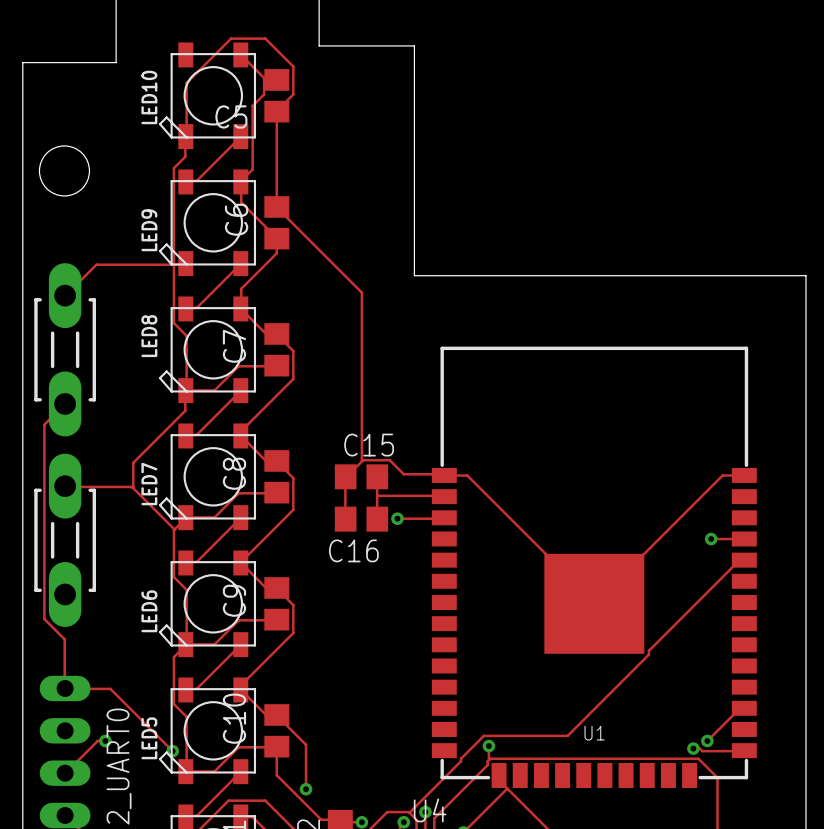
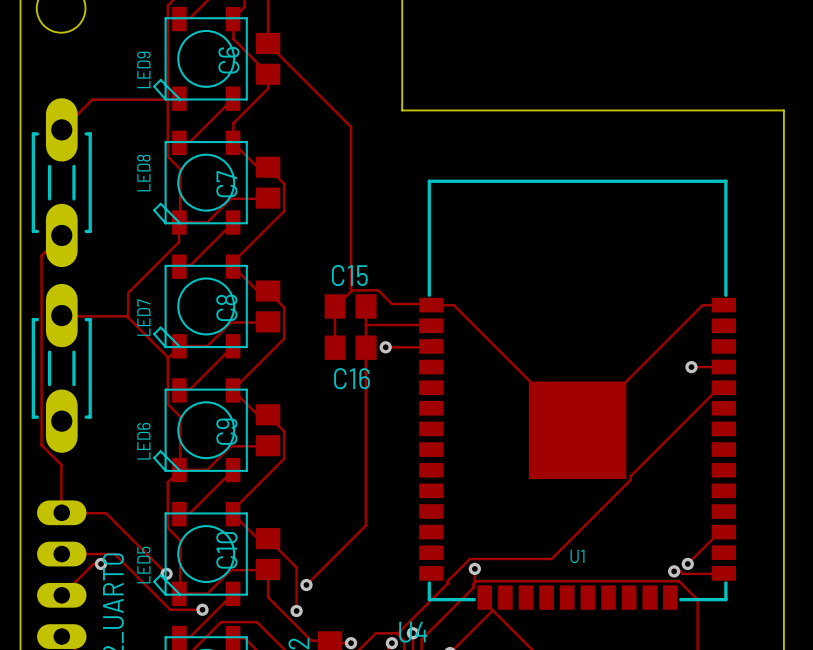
track: none -> (366, 347) (365, 525) (306, 584)
track: none -> (61, 554) (114, 554) (170, 609) (202, 609)
via: none -> (306, 584)
via: none -> (202, 609)

